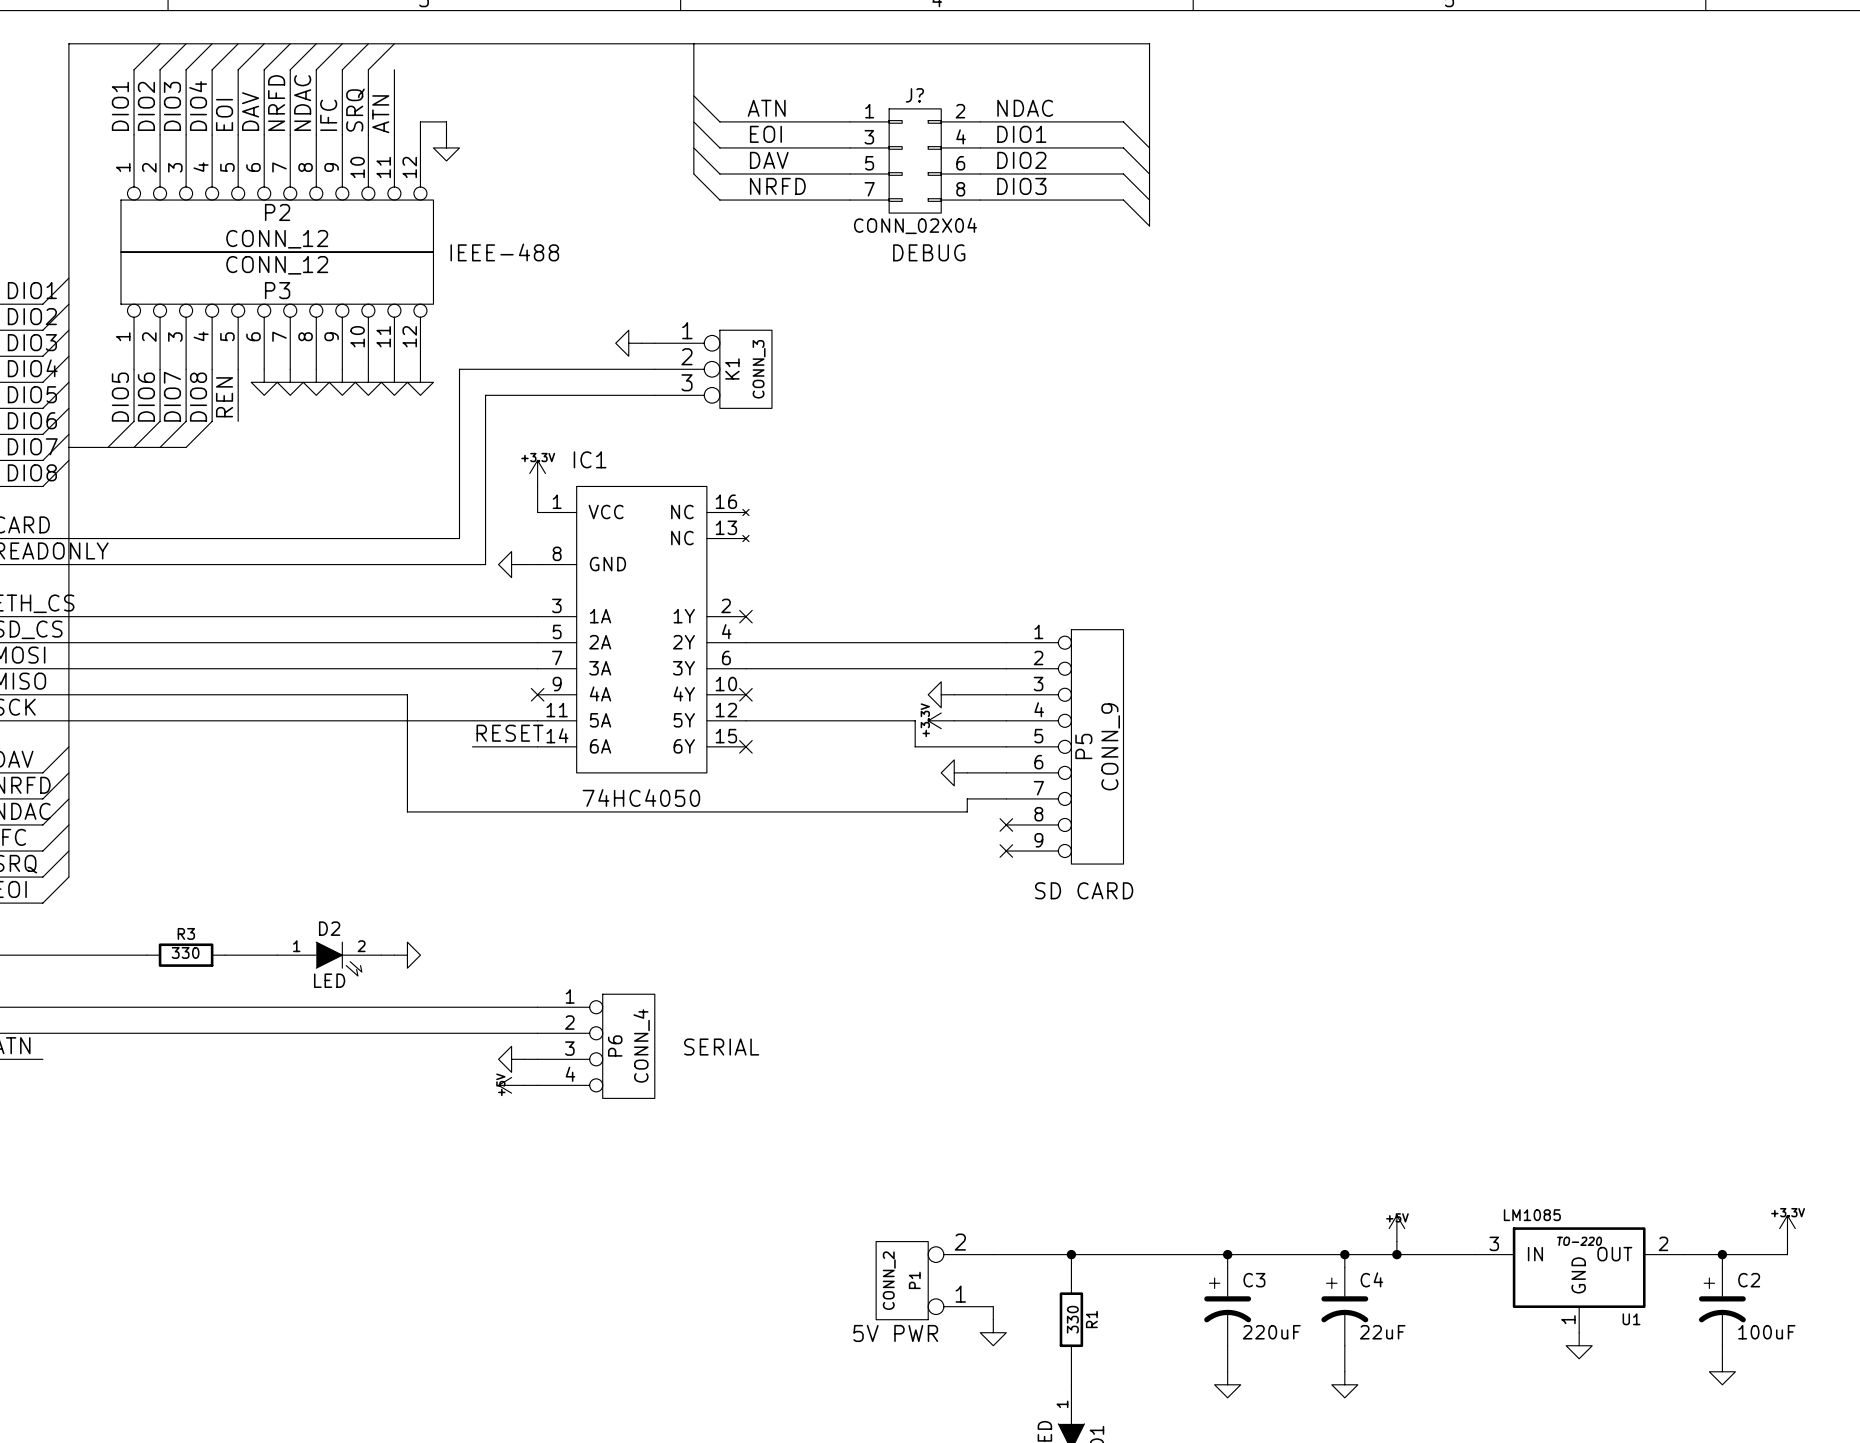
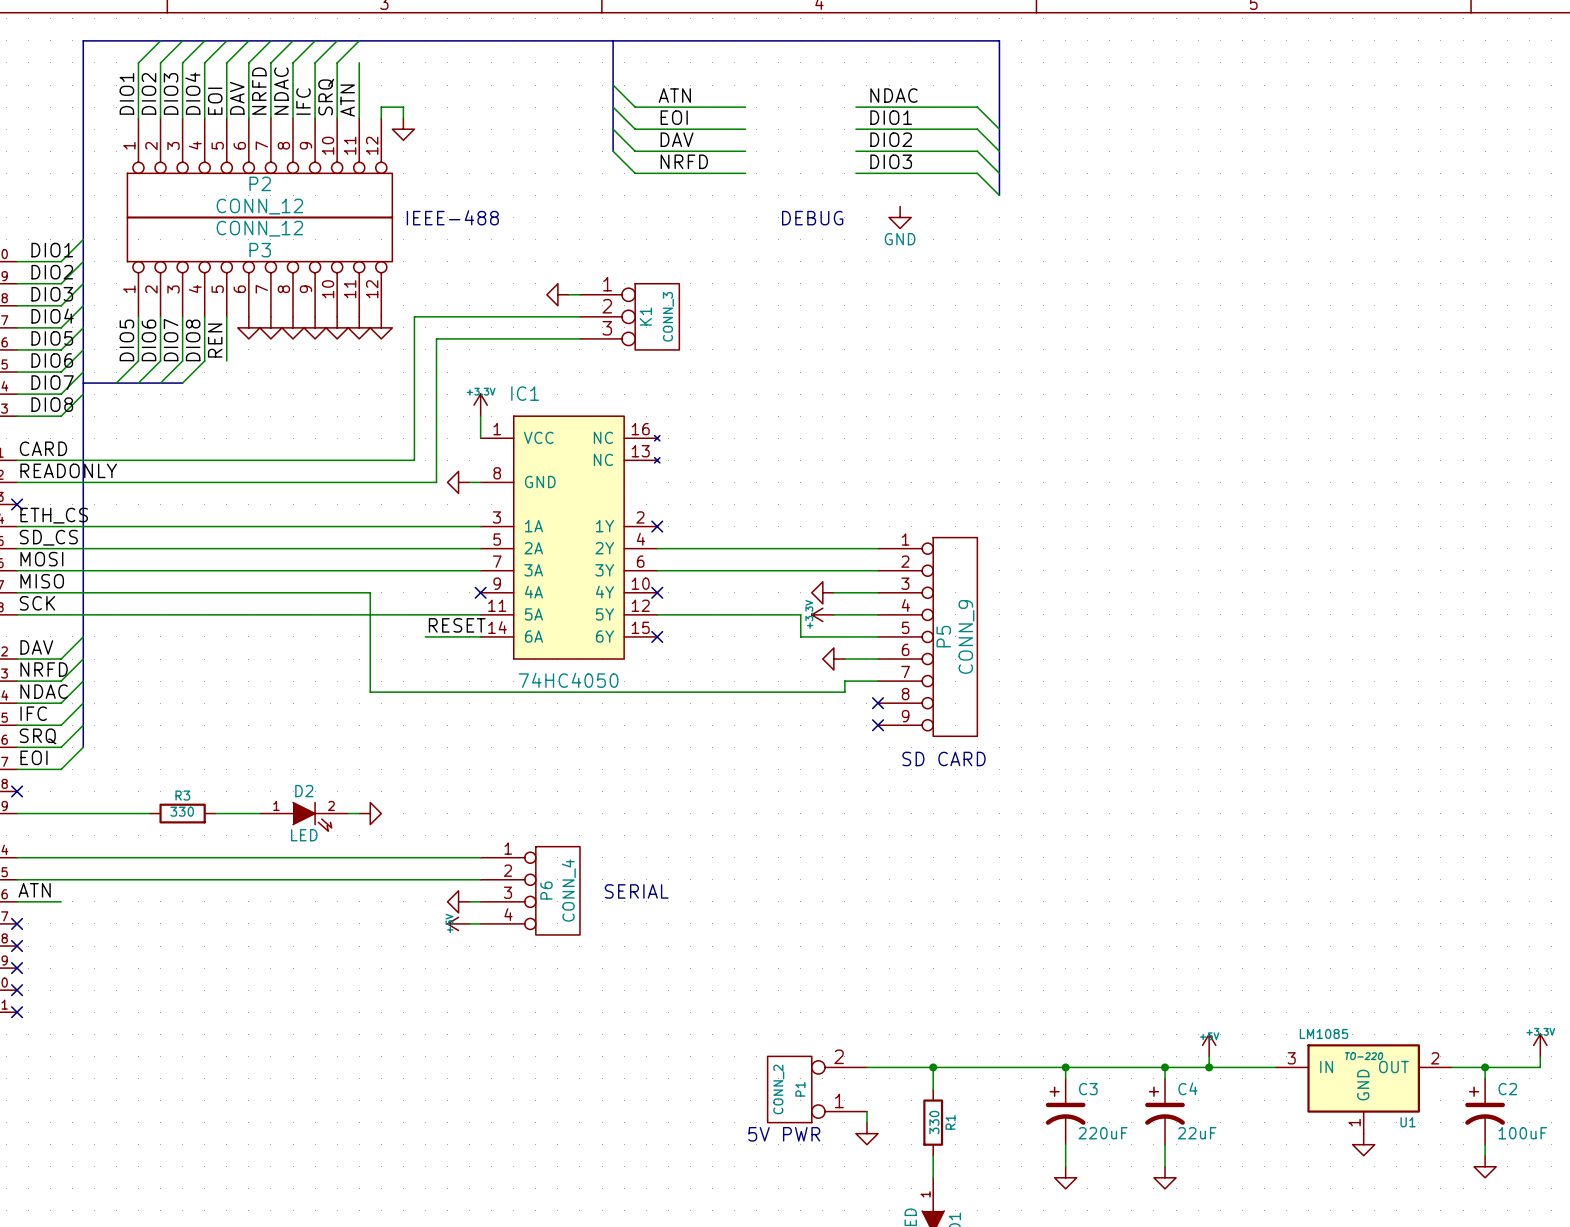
J?: CONN_02X04 (915, 160) -> none
power symbol: none -> GND (900, 217)

